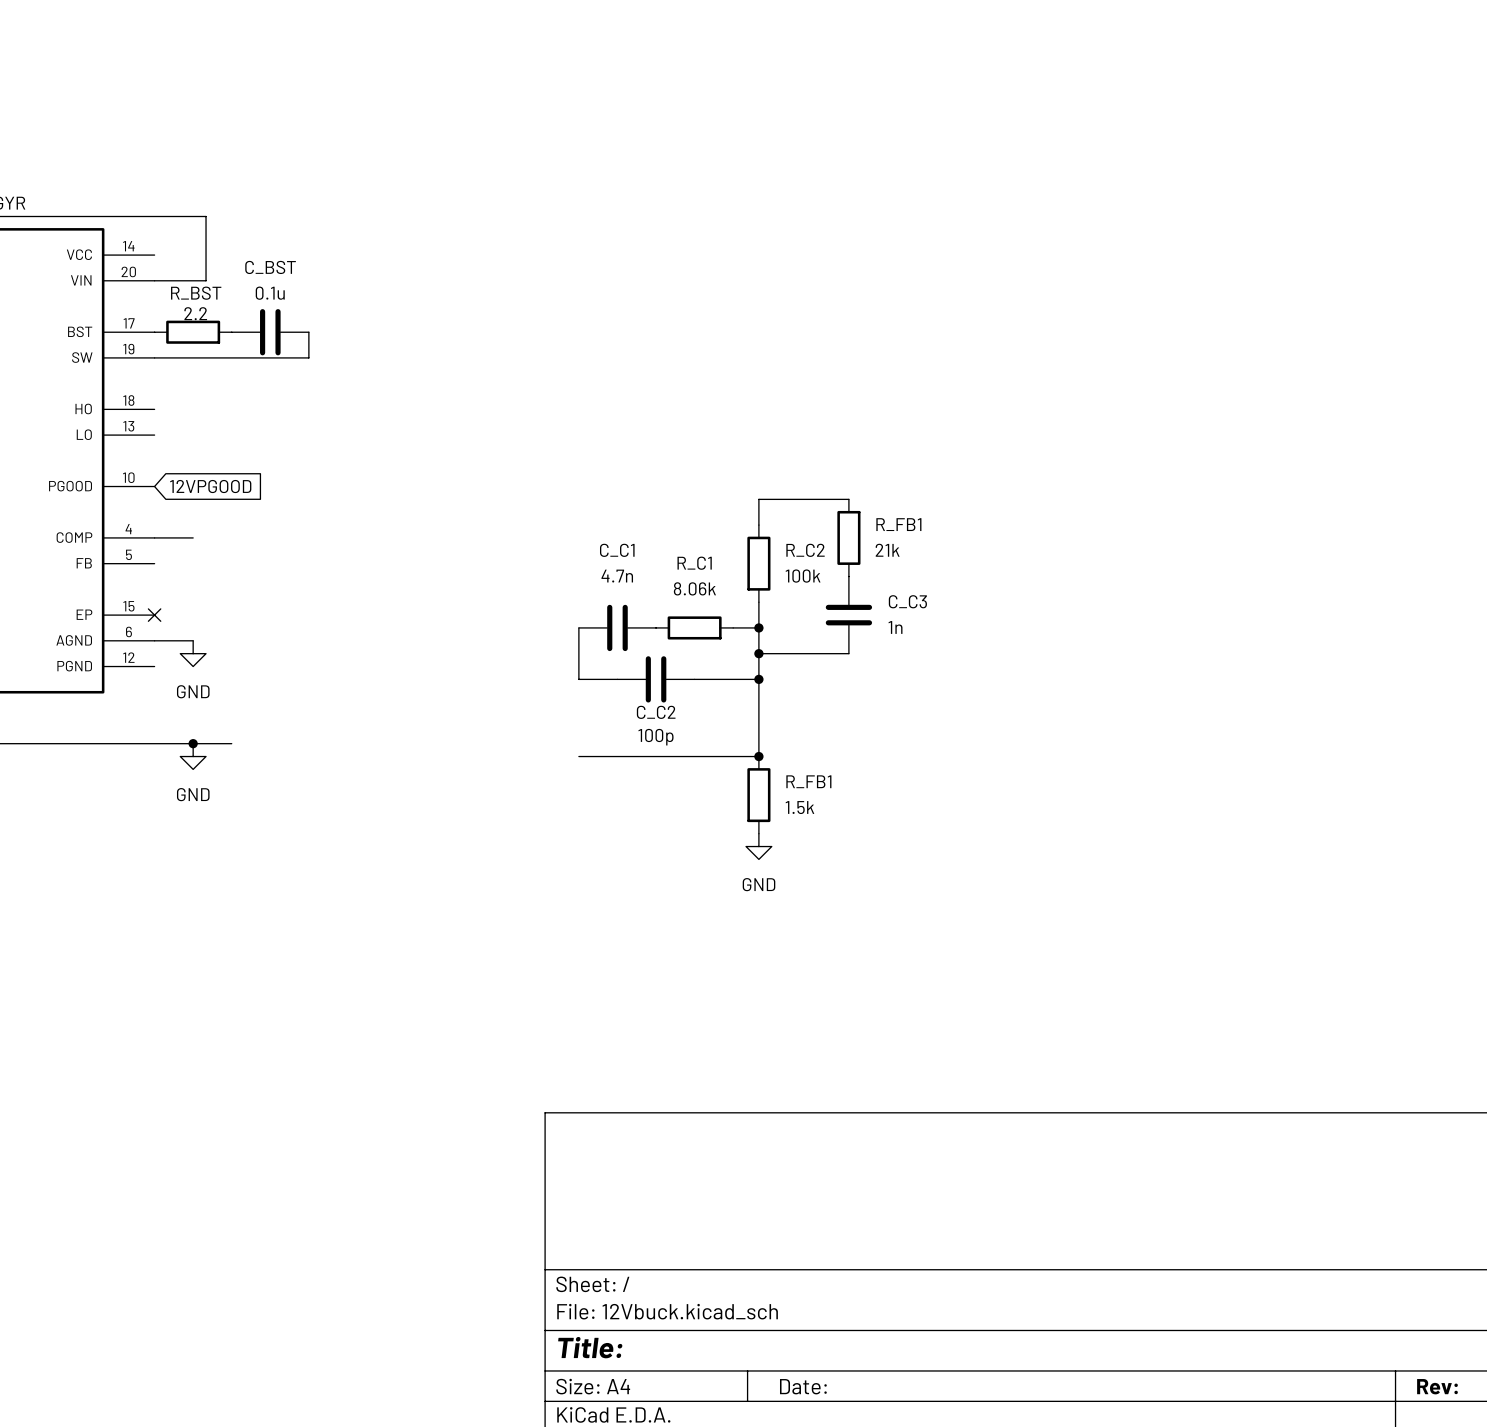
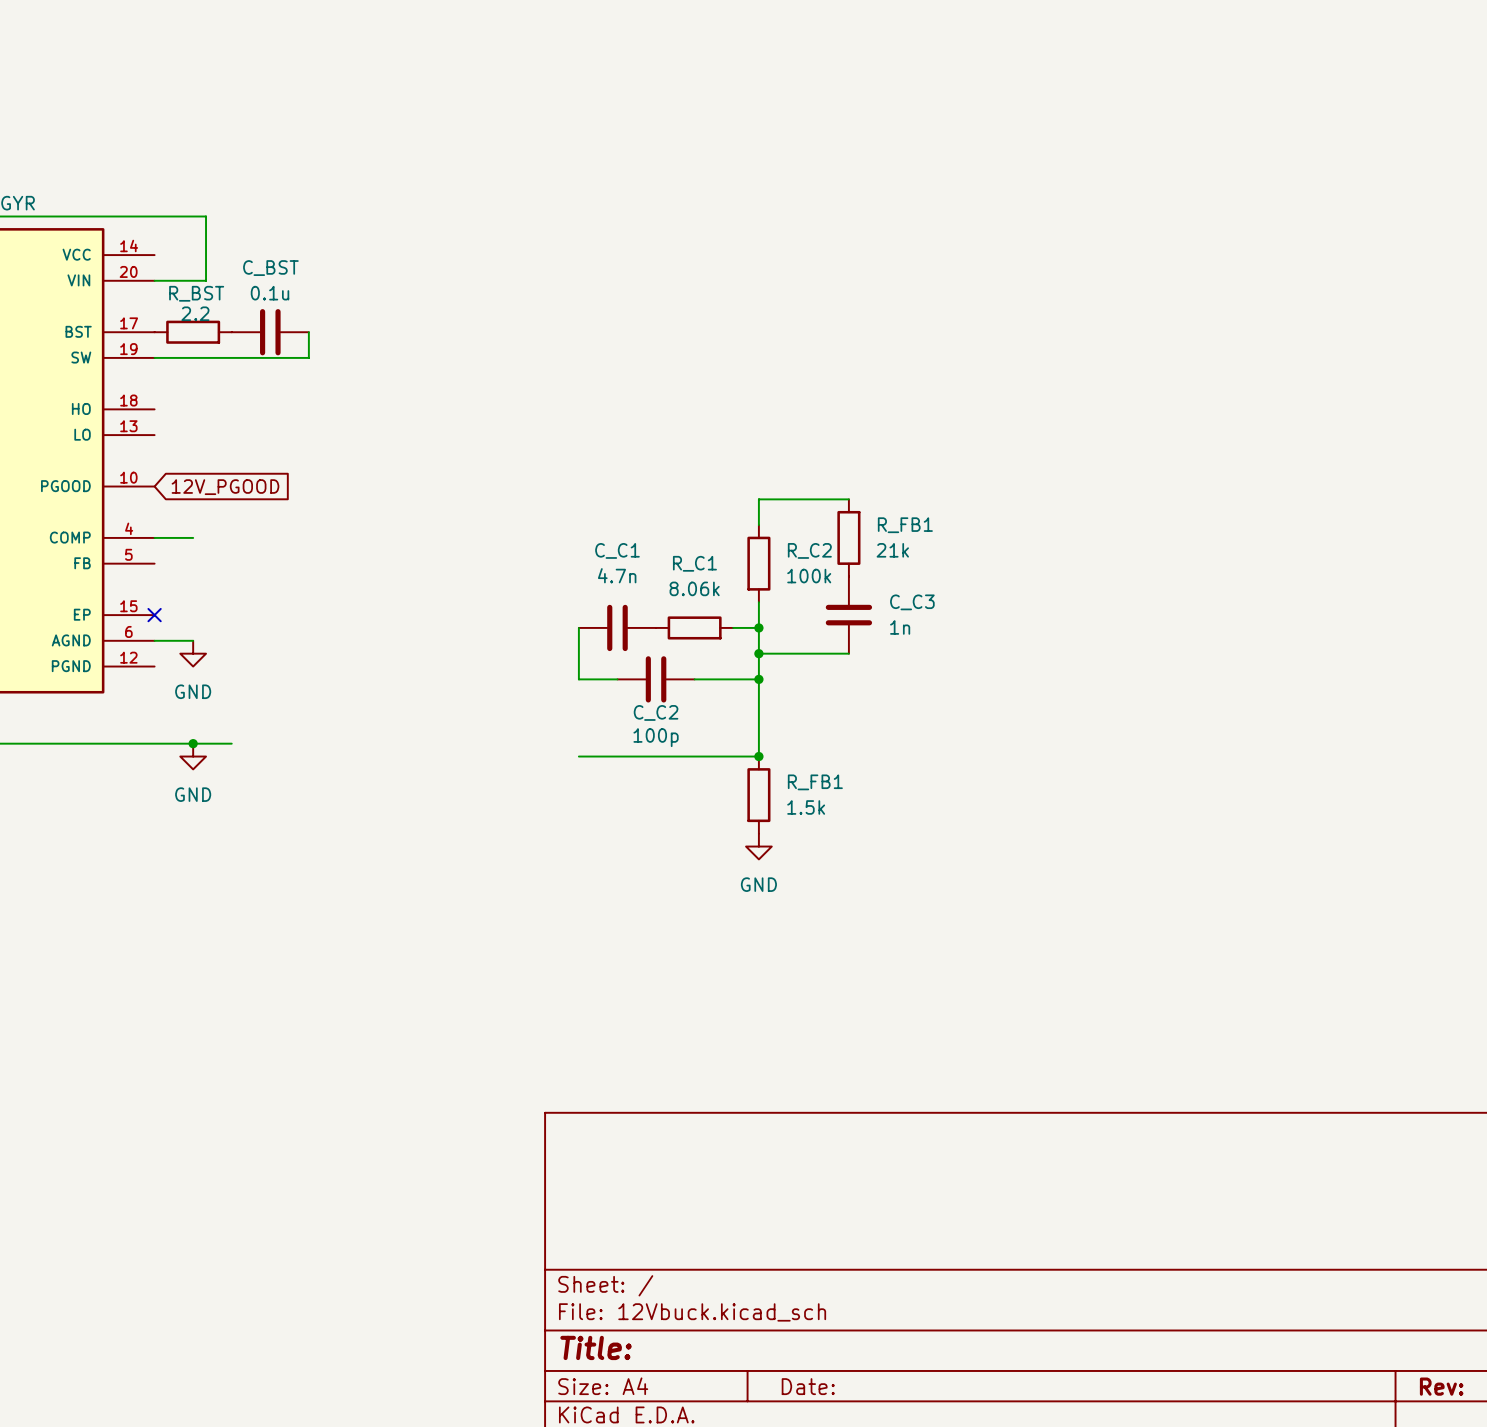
global label: 12VPGOOD (210, 486) -> 12V_PGOOD (225, 487)

